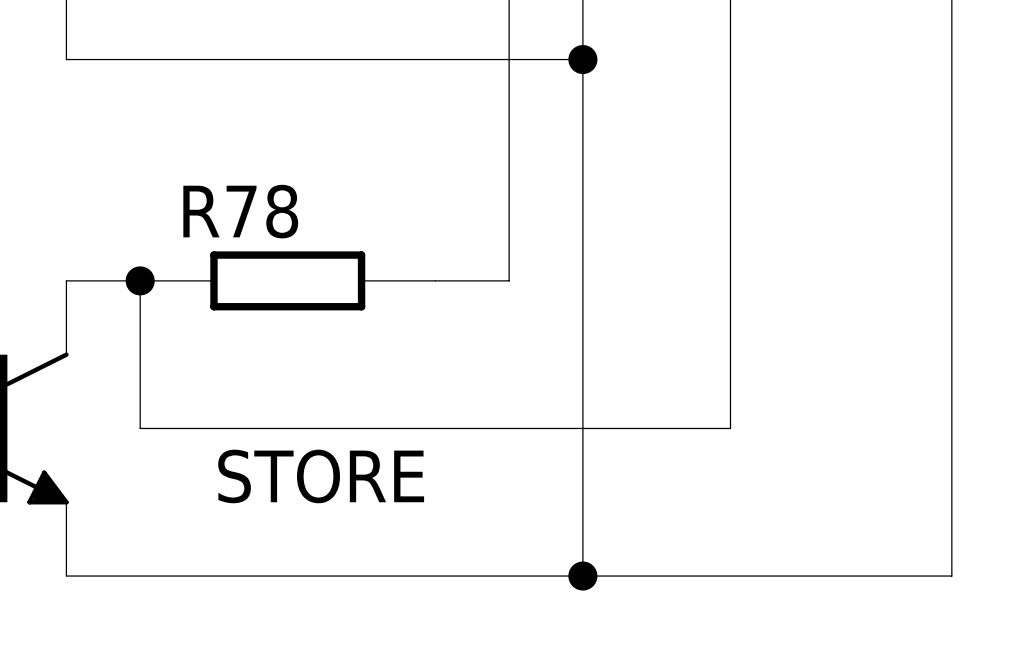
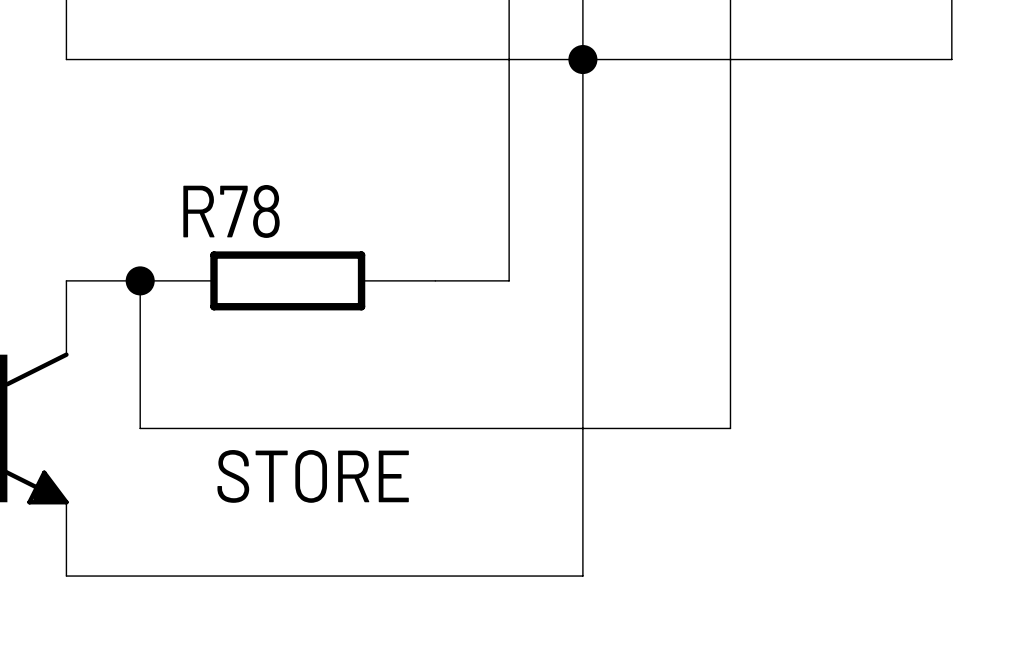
wire: (951, 59) (951, 576) (582, 576) -> (951, 59) (582, 59)
junction: (582, 576) -> none

